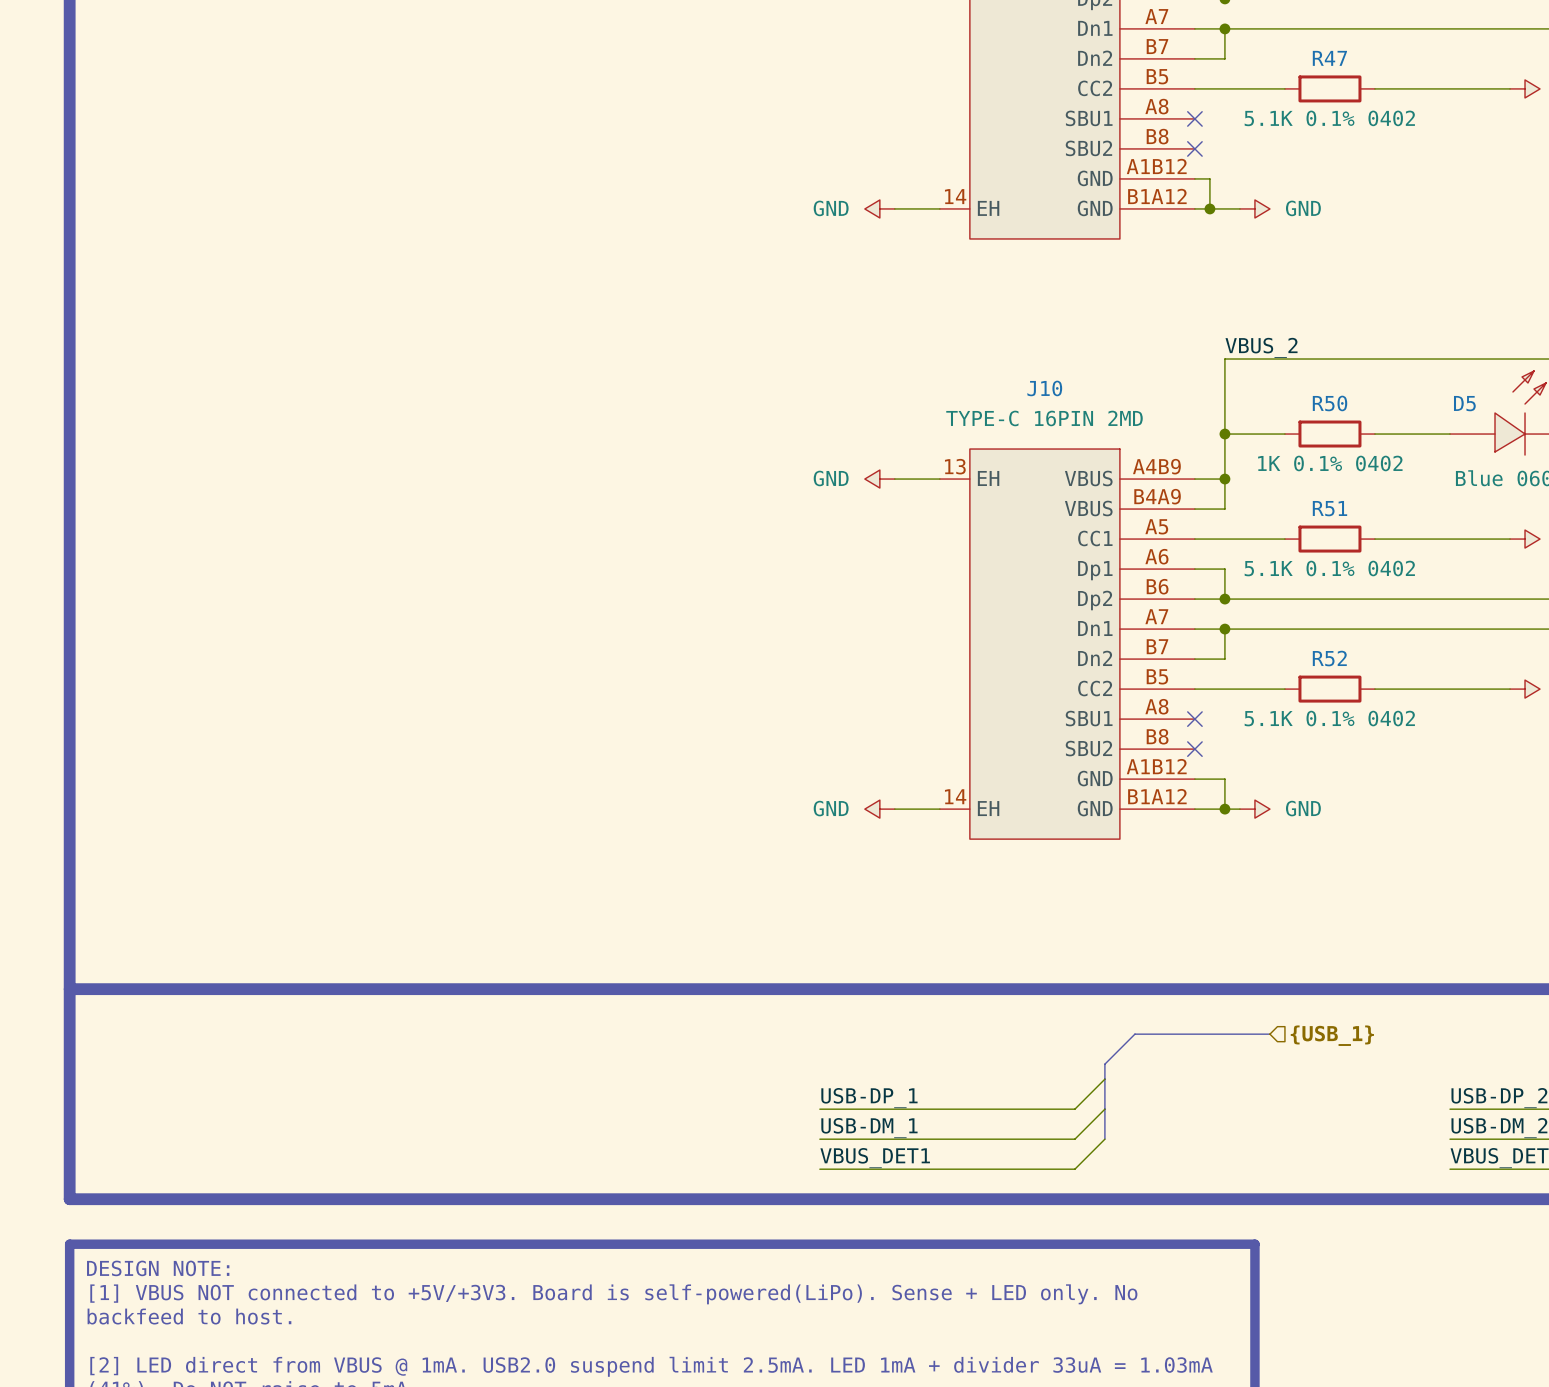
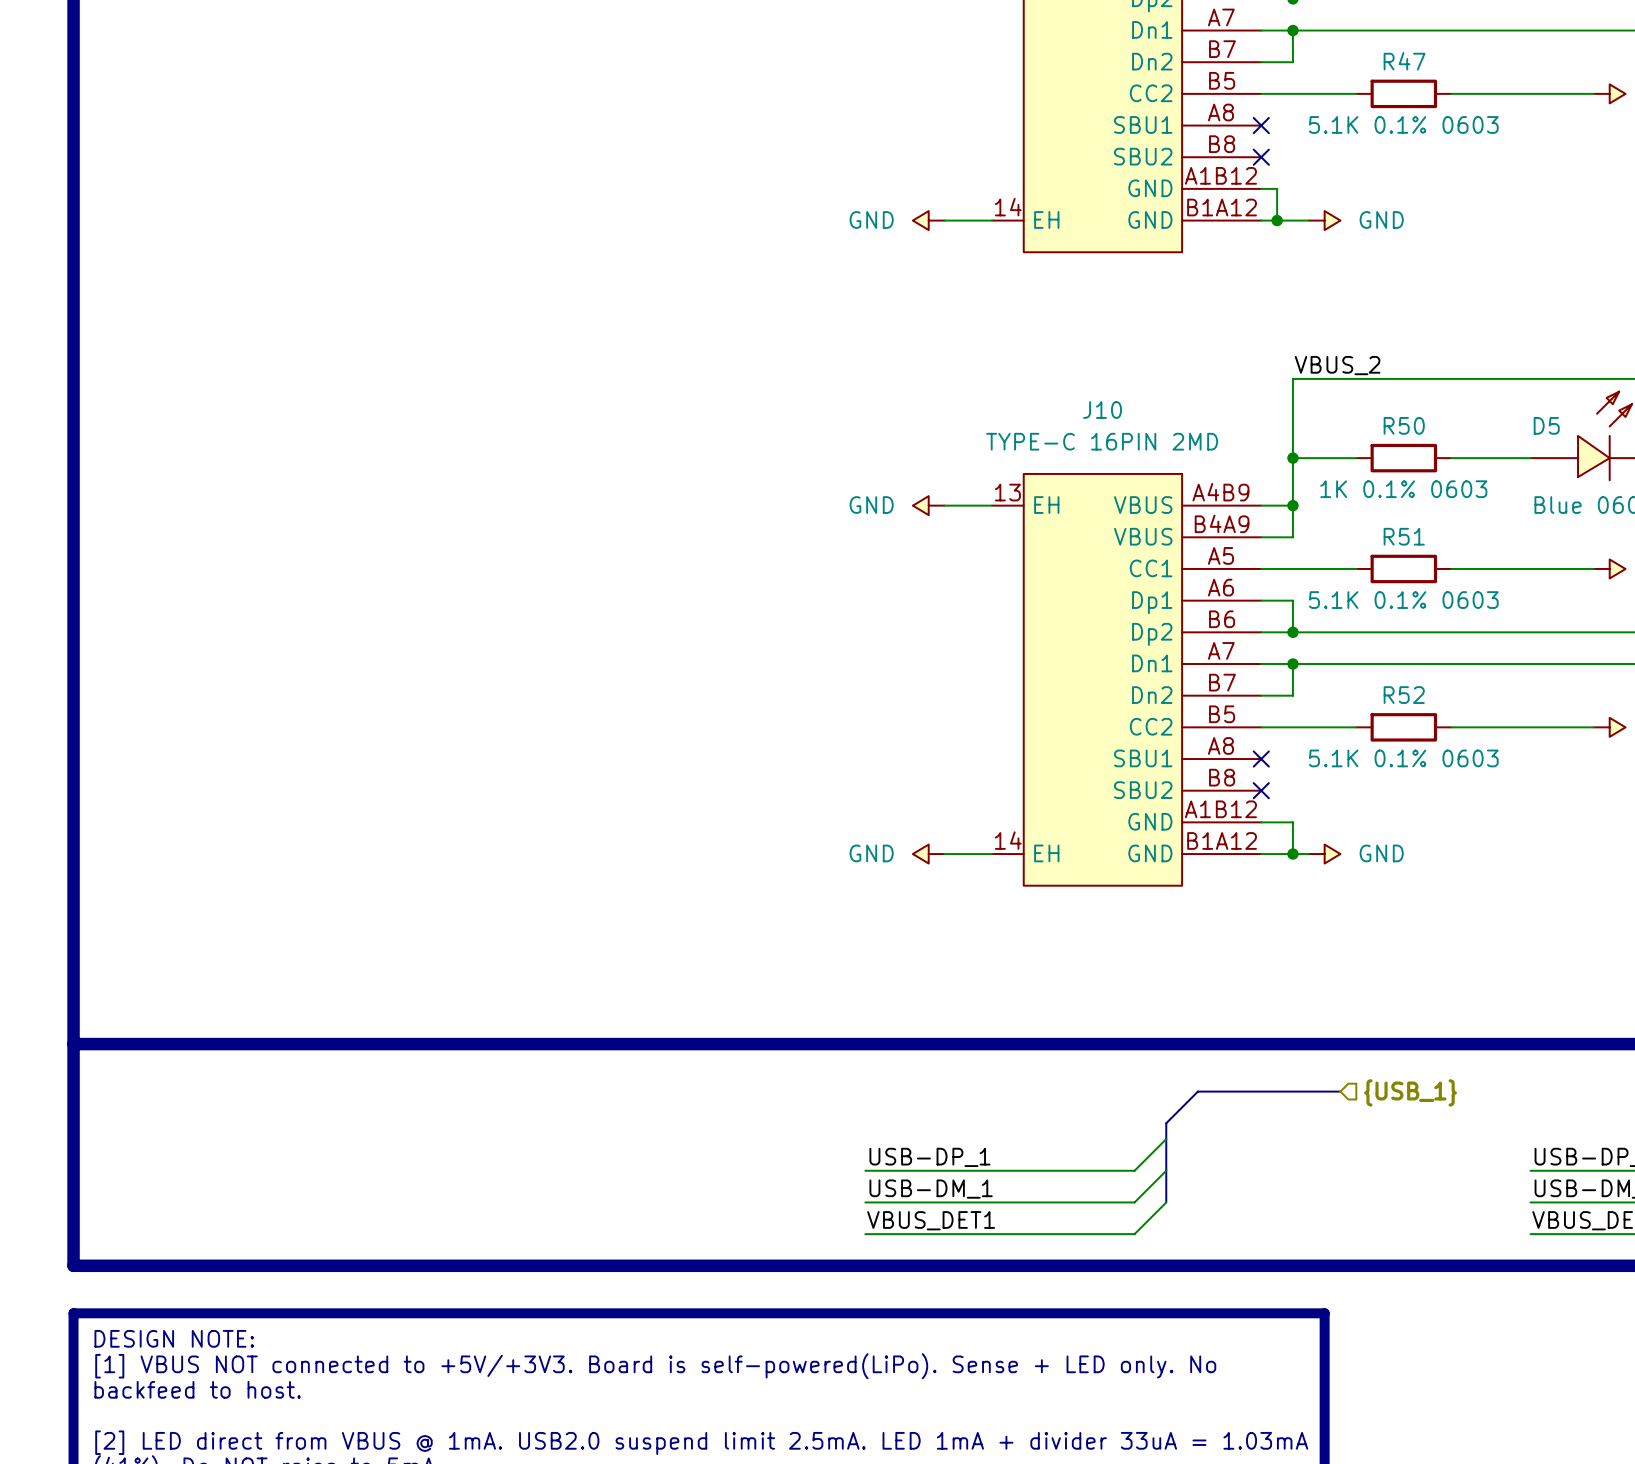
R47 value: 5.1K 0.1% 0402 (1329, 118) -> 5.1K 0.1% 0603 (1403, 124)
R50 value: 1K 0.1% 0402 (1330, 463) -> 1K 0.1% 0603 (1403, 489)
R51 value: 5.1K 0.1% 0402 (1329, 568) -> 5.1K 0.1% 0603 (1403, 600)
R52 value: 5.1K 0.1% 0402 (1329, 718) -> 5.1K 0.1% 0603 (1403, 758)

